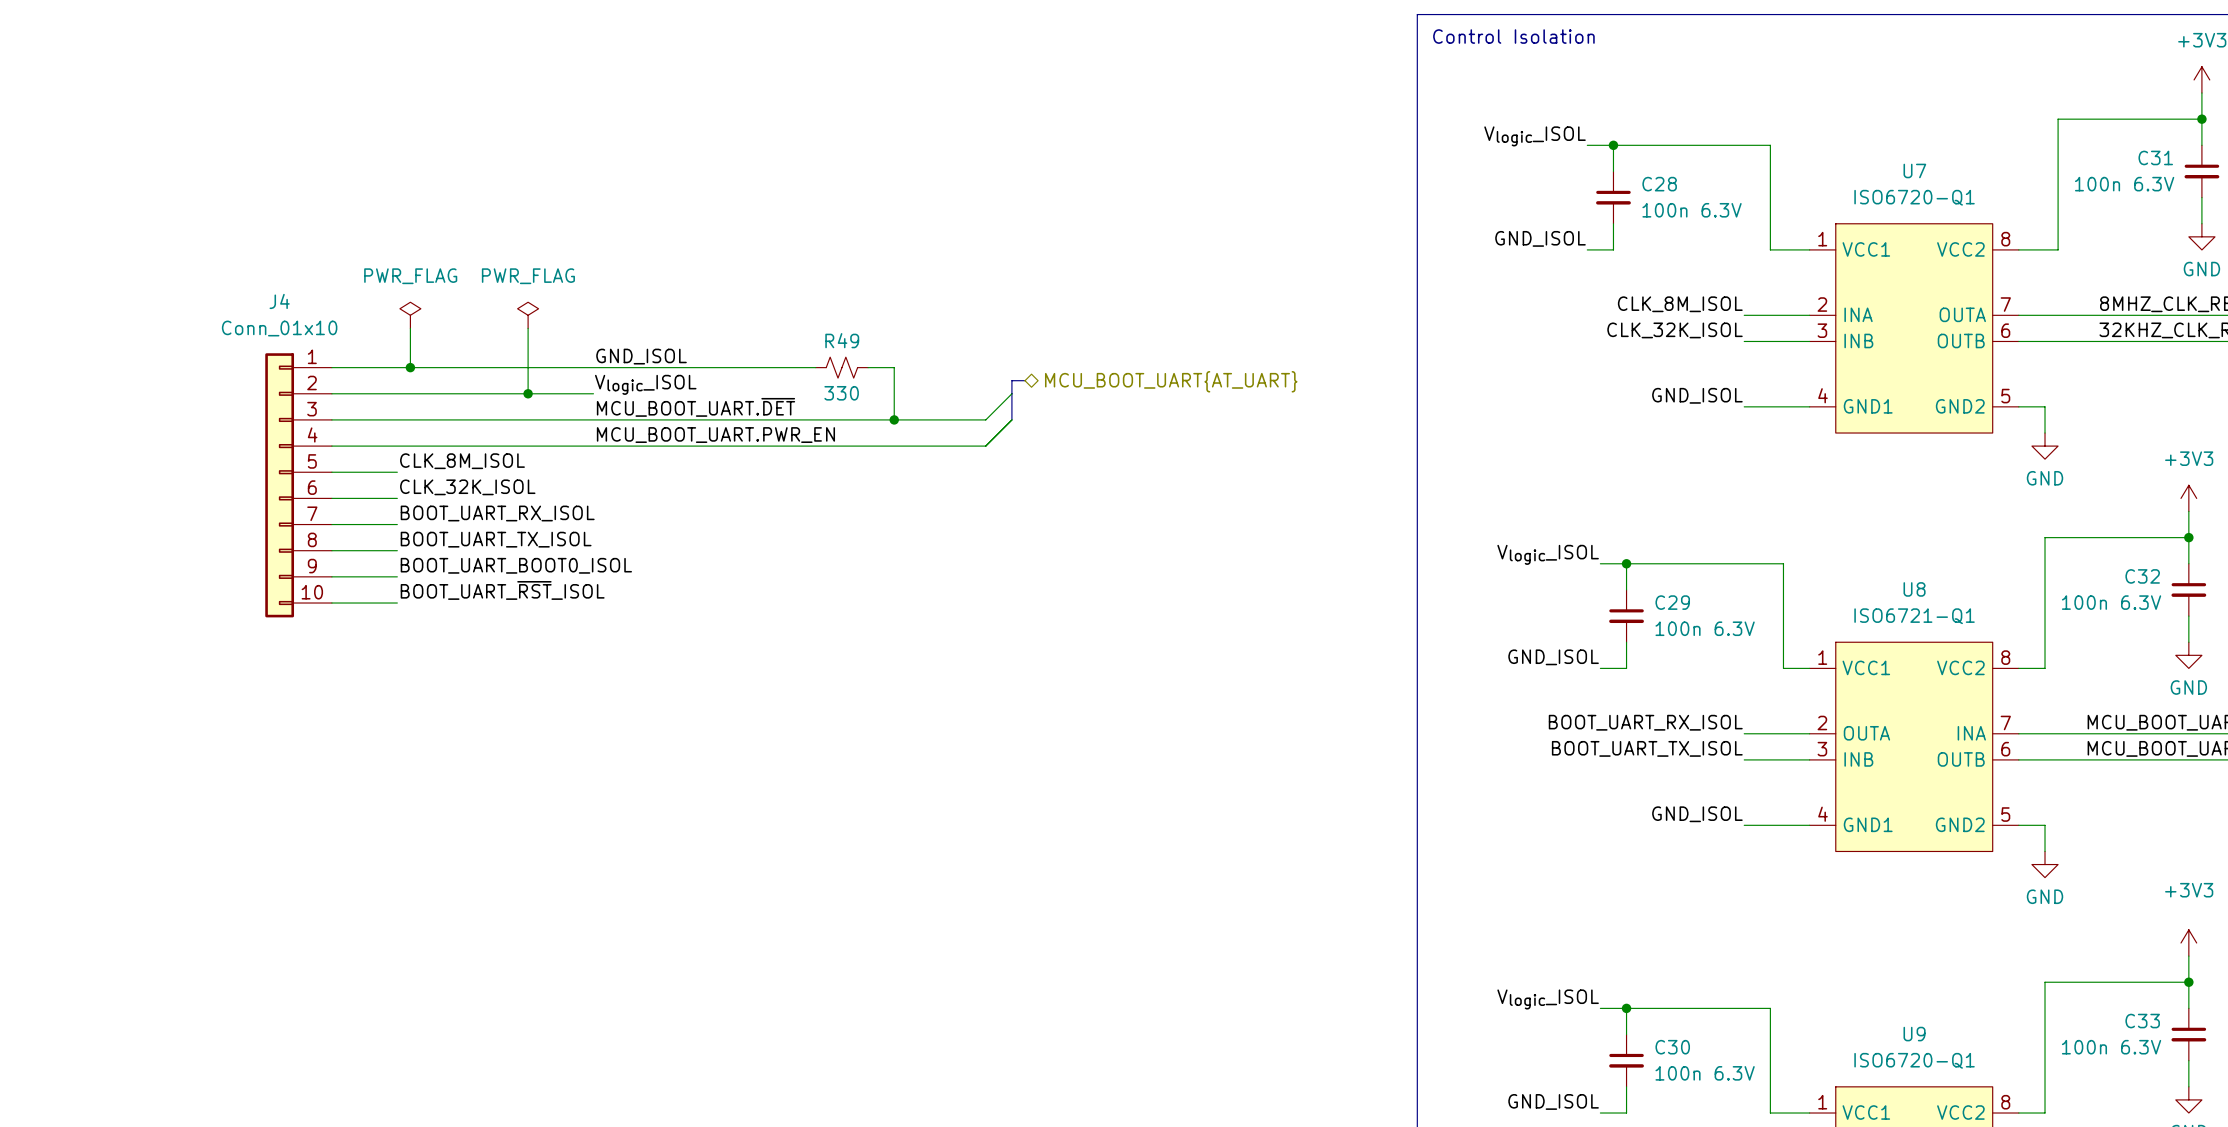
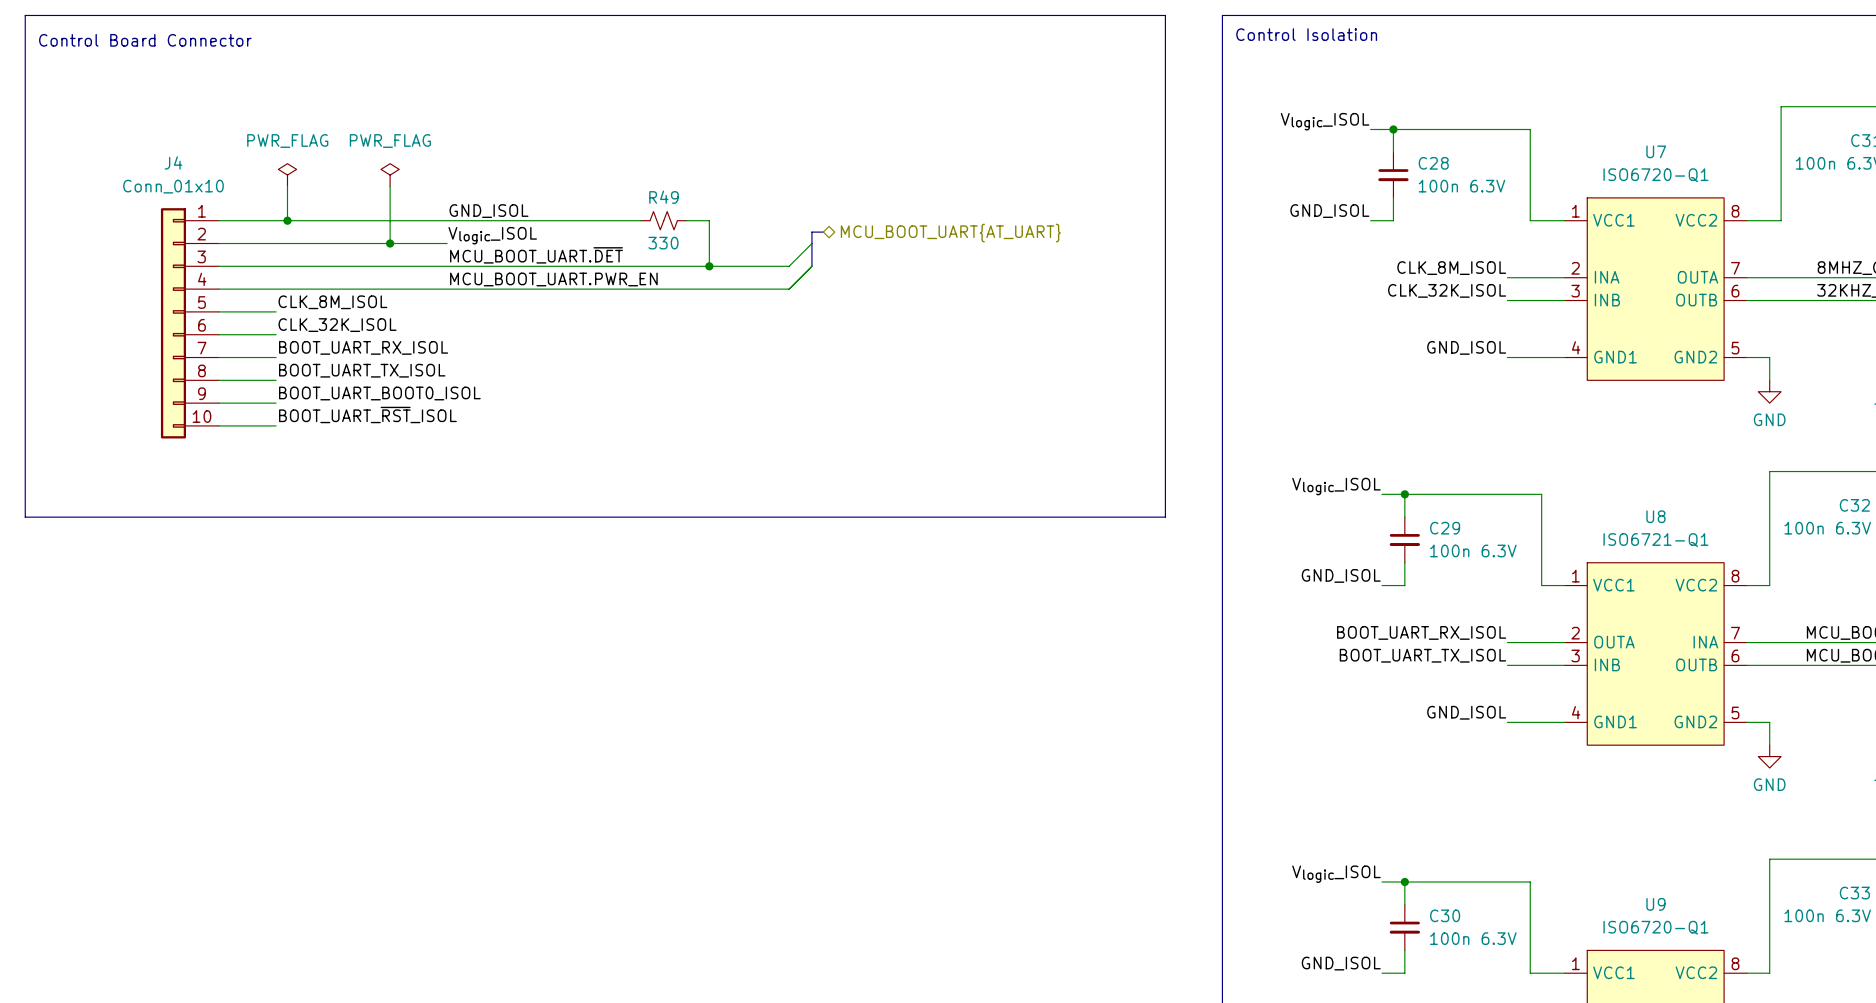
line: none -> (25, 15) (1165, 15) (1165, 517) (25, 517) (25, 15)
text: none -> Control Board Connector (145, 40)
power symbol: none -> PWR_FLAG (287, 175)
power symbol: none -> PWR_FLAG (390, 175)
junction: none -> (287, 220)
junction: none -> (390, 243)
junction: none -> (709, 266)
power symbol: PWR_FLAG (410, 315) -> none
power symbol: PWR_FLAG (528, 315) -> none
wire: (410, 328) (410, 367) -> (287, 186) (287, 220)
wire: (528, 328) (528, 393) -> (390, 186) (390, 243)
label position: GND_ISOL (641, 356) -> GND_ISOL (489, 211)
wire: (331, 367) (815, 367) -> (219, 220) (640, 220)
junction: (410, 367) -> none
R49 position: (841, 367) -> (663, 220)
wire: (868, 367) (894, 367) (894, 419) -> (686, 220) (709, 220) (709, 266)
bus: (1025, 380) (1011, 380) (1011, 419) -> (823, 232) (811, 232) (811, 266)
hierarchical label position: MCU_BOOT_UART{AT_UART} (1171, 381) -> MCU_BOOT_UART{AT_UART} (950, 233)
label position: Vlogic_ISOL (645, 384) -> Vlogic_ISOL (492, 235)
wire: (331, 393) (593, 393) -> (219, 243) (447, 243)
junction: (528, 393) -> none
wire: (1011, 393) (985, 419) (331, 419) -> (811, 243) (789, 266) (219, 266)
label position: MCU_BOOT_UART.~{DET} (696, 407) -> MCU_BOOT_UART.~{DET} (536, 255)
junction: (894, 419) -> none
wire: (1011, 419) (985, 446) (331, 446) -> (811, 266) (789, 289) (219, 289)
label position: MCU_BOOT_UART.PWR_EN (715, 435) -> MCU_BOOT_UART.PWR_EN (553, 279)
label position: CLK_8M_ISOL (462, 461) -> CLK_8M_ISOL (332, 302)
wire: (331, 472) (397, 472) -> (219, 311) (276, 311)
J4 position: (298, 485) -> (190, 323)
label position: CLK_32K_ISOL (467, 487) -> CLK_32K_ISOL (337, 325)
wire: (331, 498) (397, 498) -> (219, 334) (276, 334)
label position: BOOT_UART_RX_ISOL (497, 513) -> BOOT_UART_RX_ISOL (363, 347)
wire: (331, 524) (397, 524) -> (219, 357) (276, 357)
label position: BOOT_UART_TX_ISOL (496, 539) -> BOOT_UART_TX_ISOL (362, 370)
wire: (331, 550) (397, 550) -> (219, 380) (276, 380)
label position: BOOT_UART_BOOT0_ISOL (516, 565) -> BOOT_UART_BOOT0_ISOL (379, 393)
wire: (331, 576) (397, 576) -> (219, 403) (276, 403)
label position: BOOT_UART_~{RST}_ISOL (502, 590) -> BOOT_UART_~{RST}_ISOL (367, 414)
wire: (331, 603) (397, 603) -> (219, 425) (276, 425)

